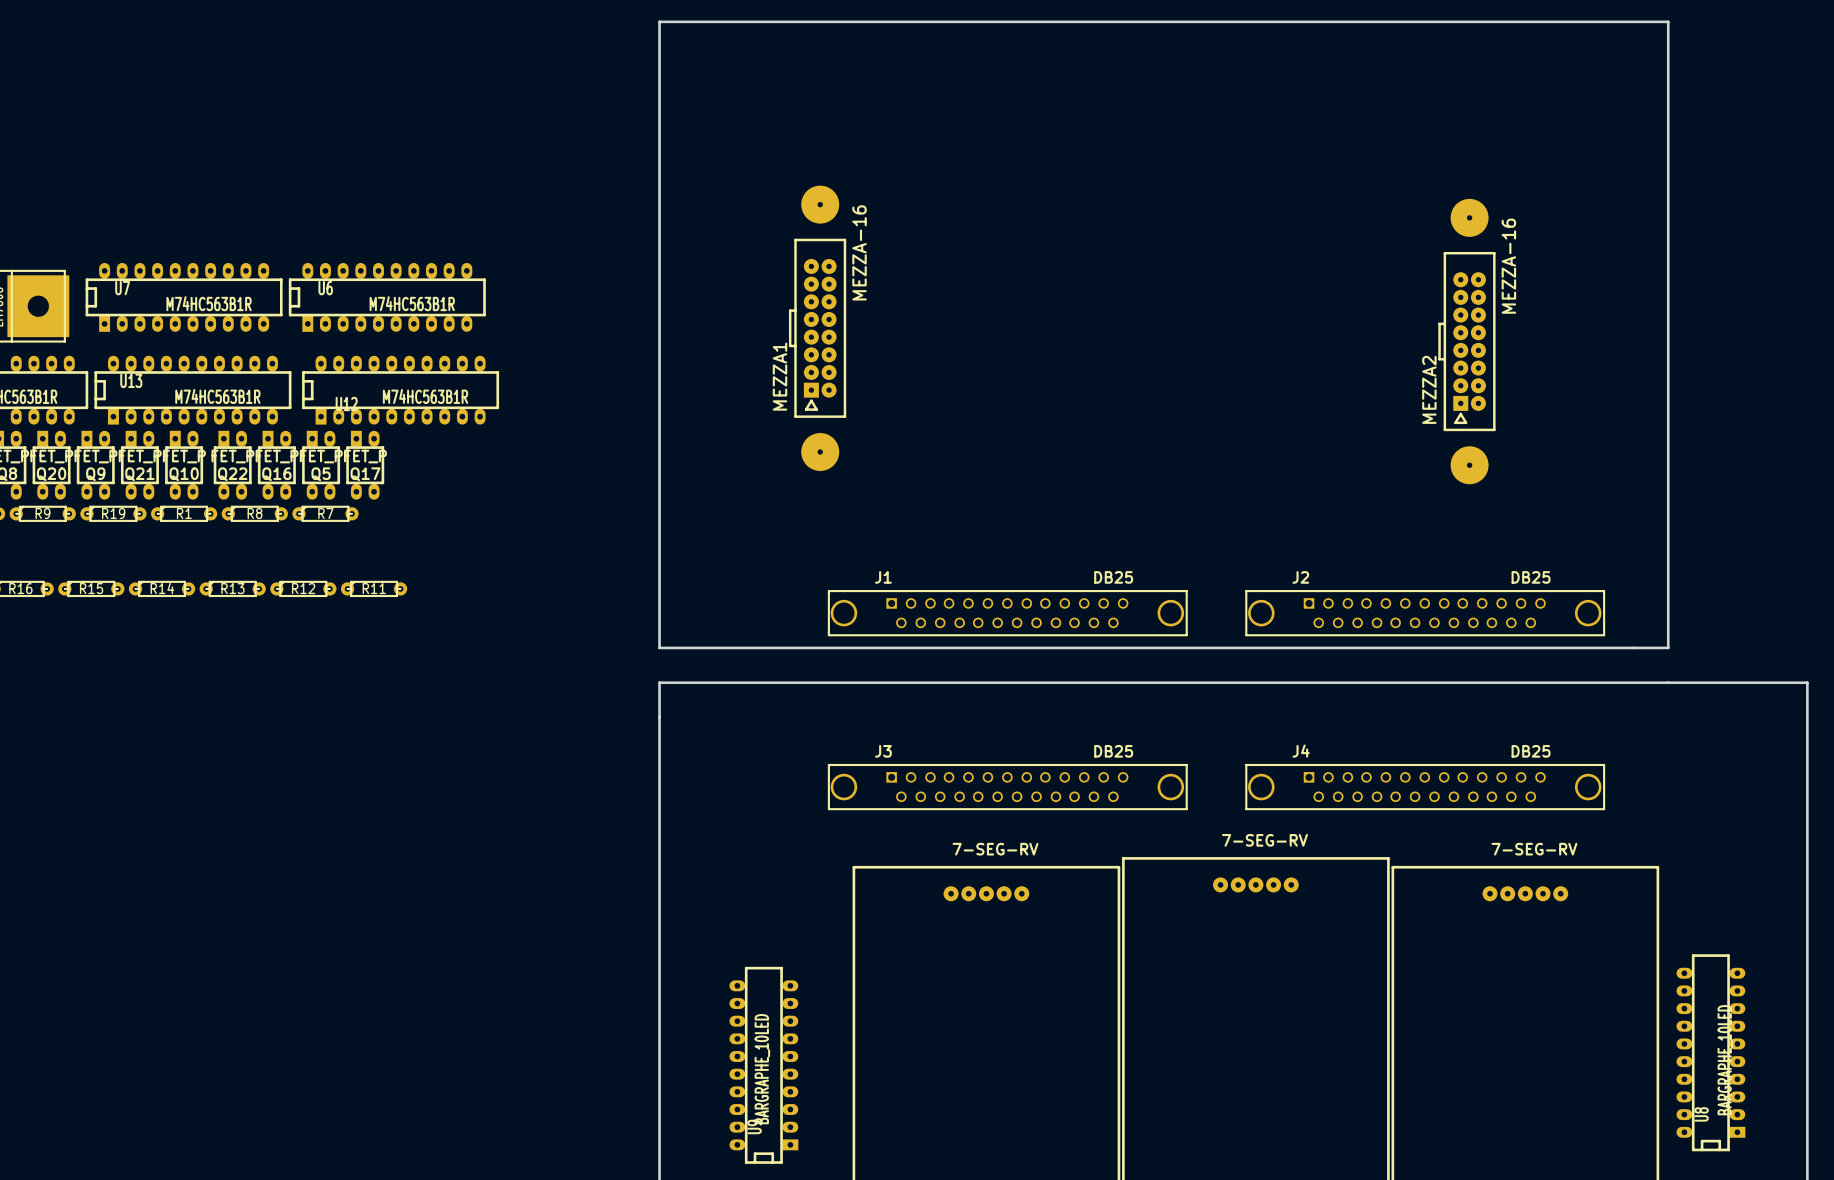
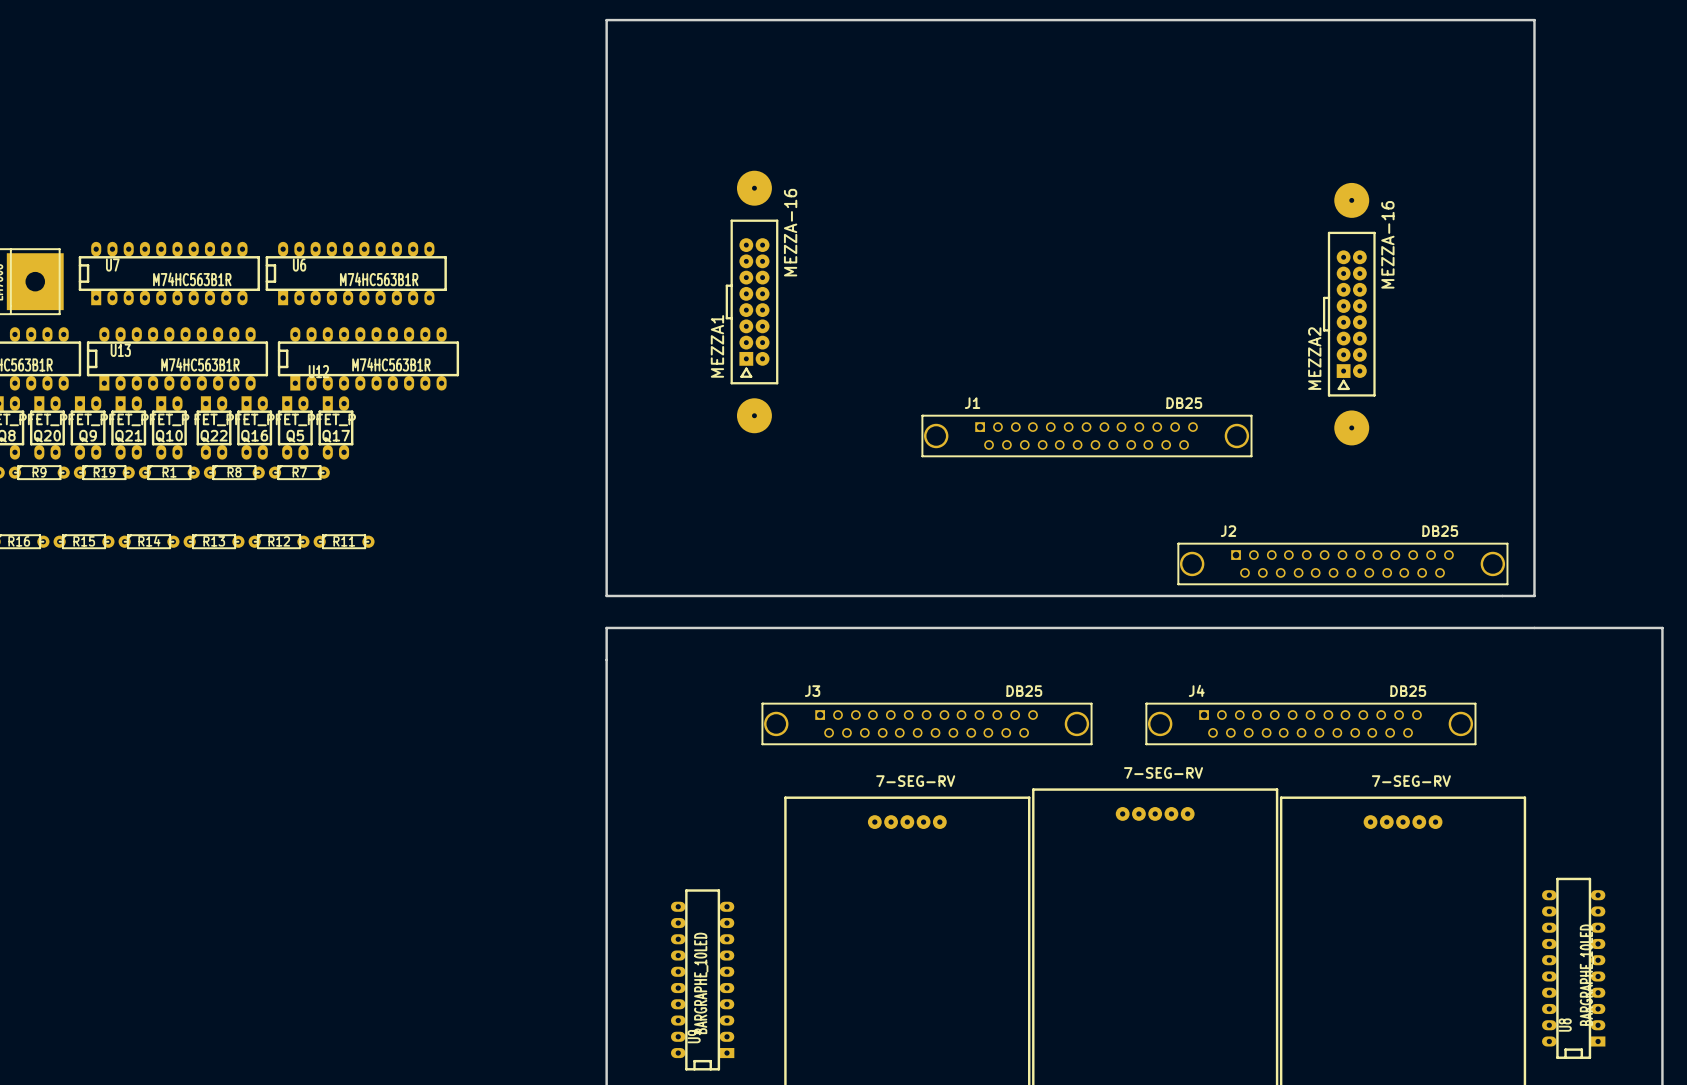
J1 position: (1007, 613) -> (1086, 436)
J2 position: (1425, 613) -> (1342, 563)

